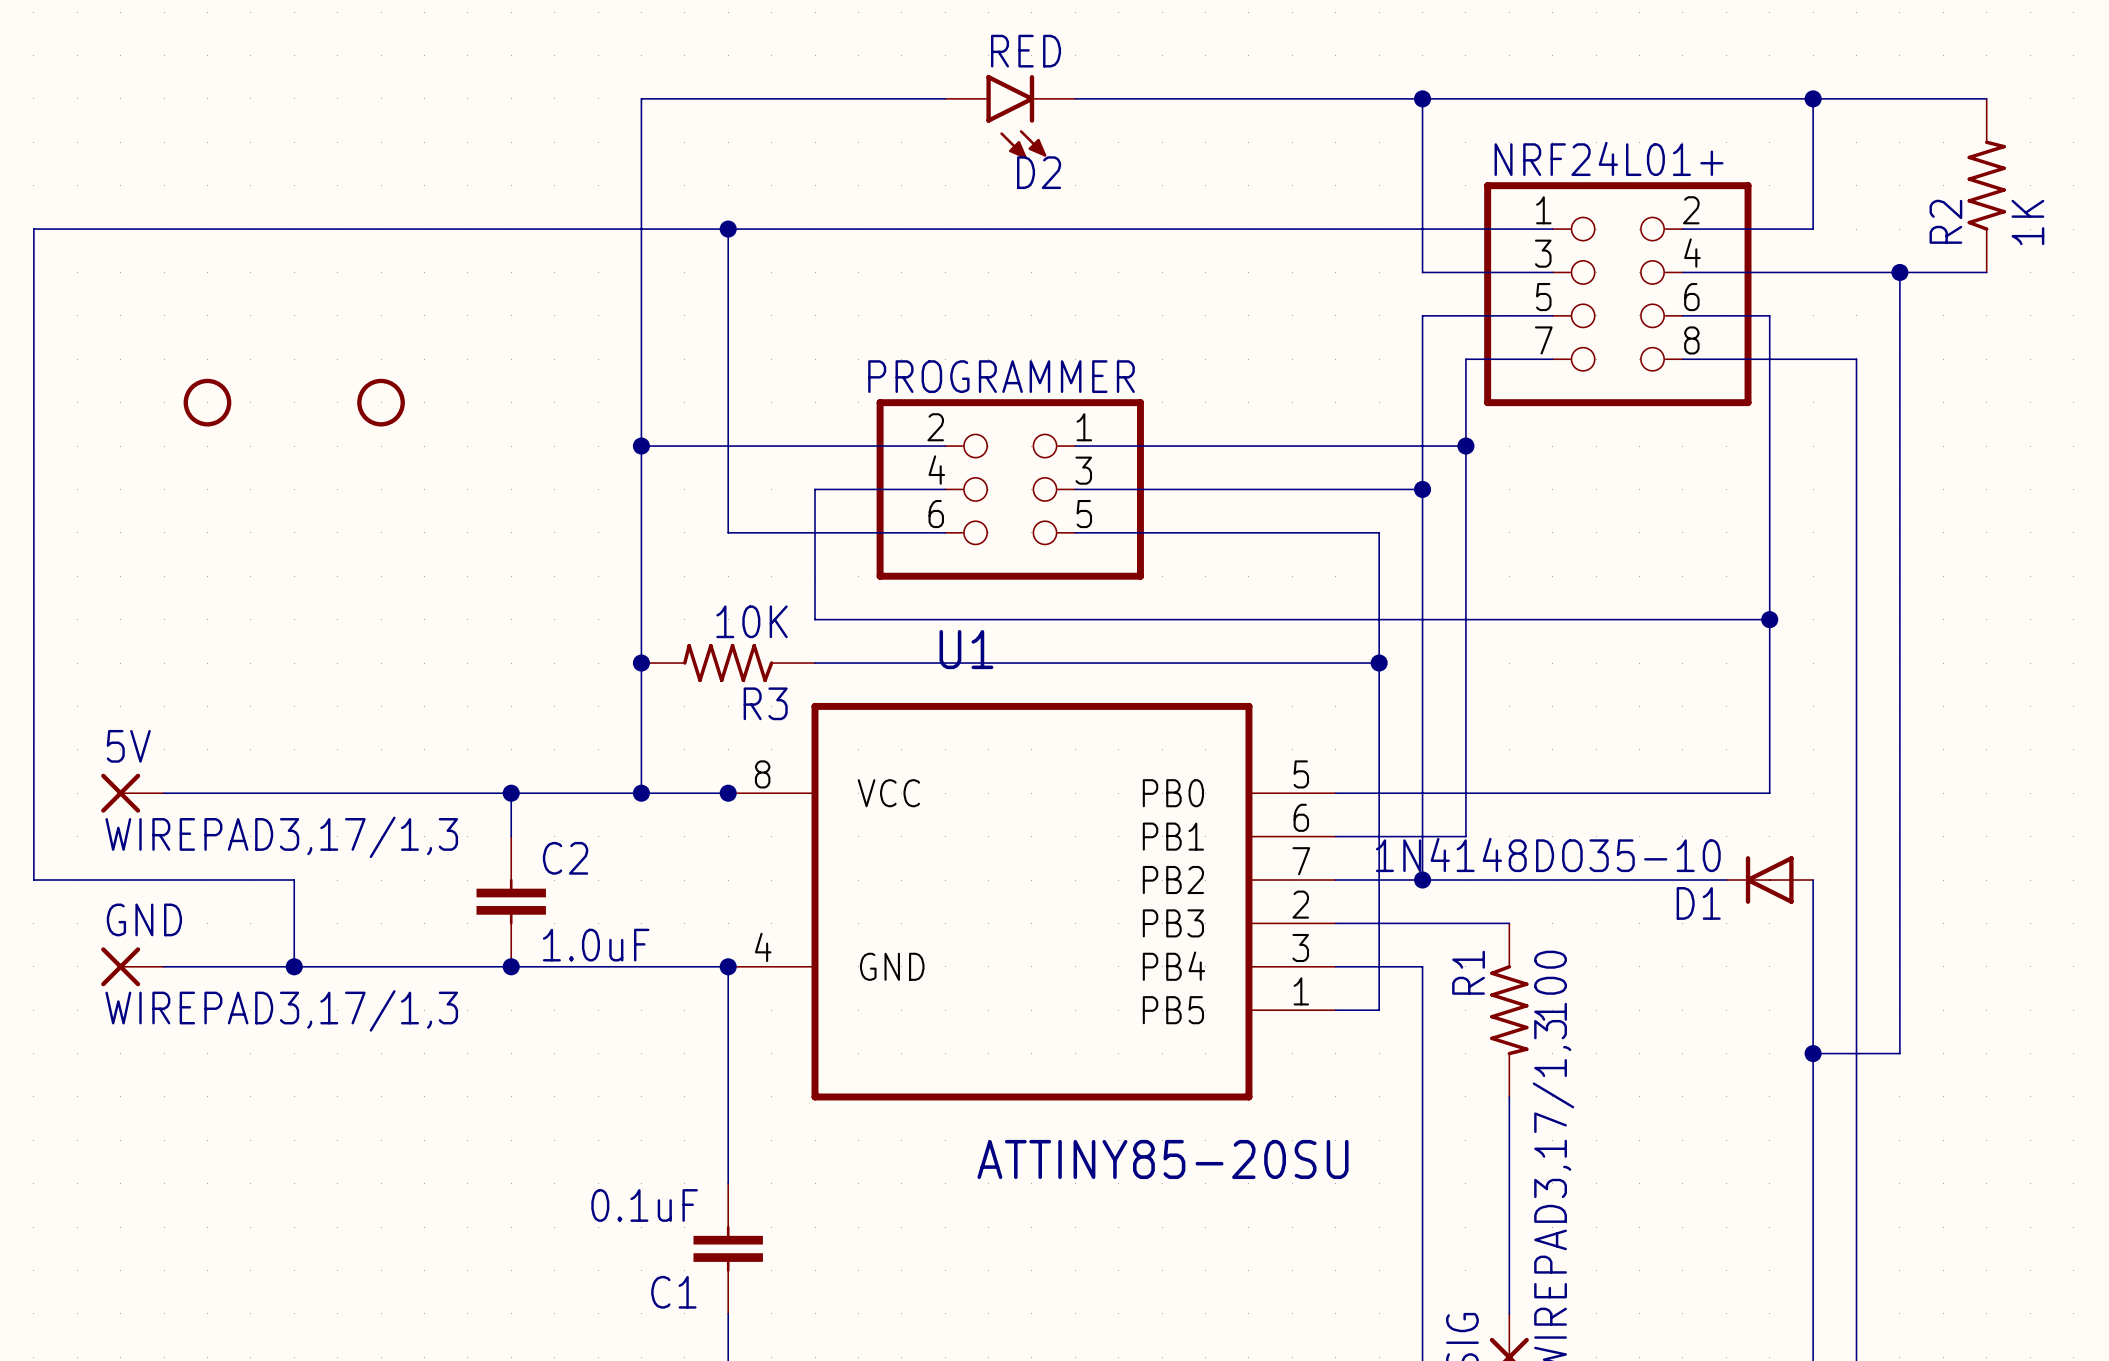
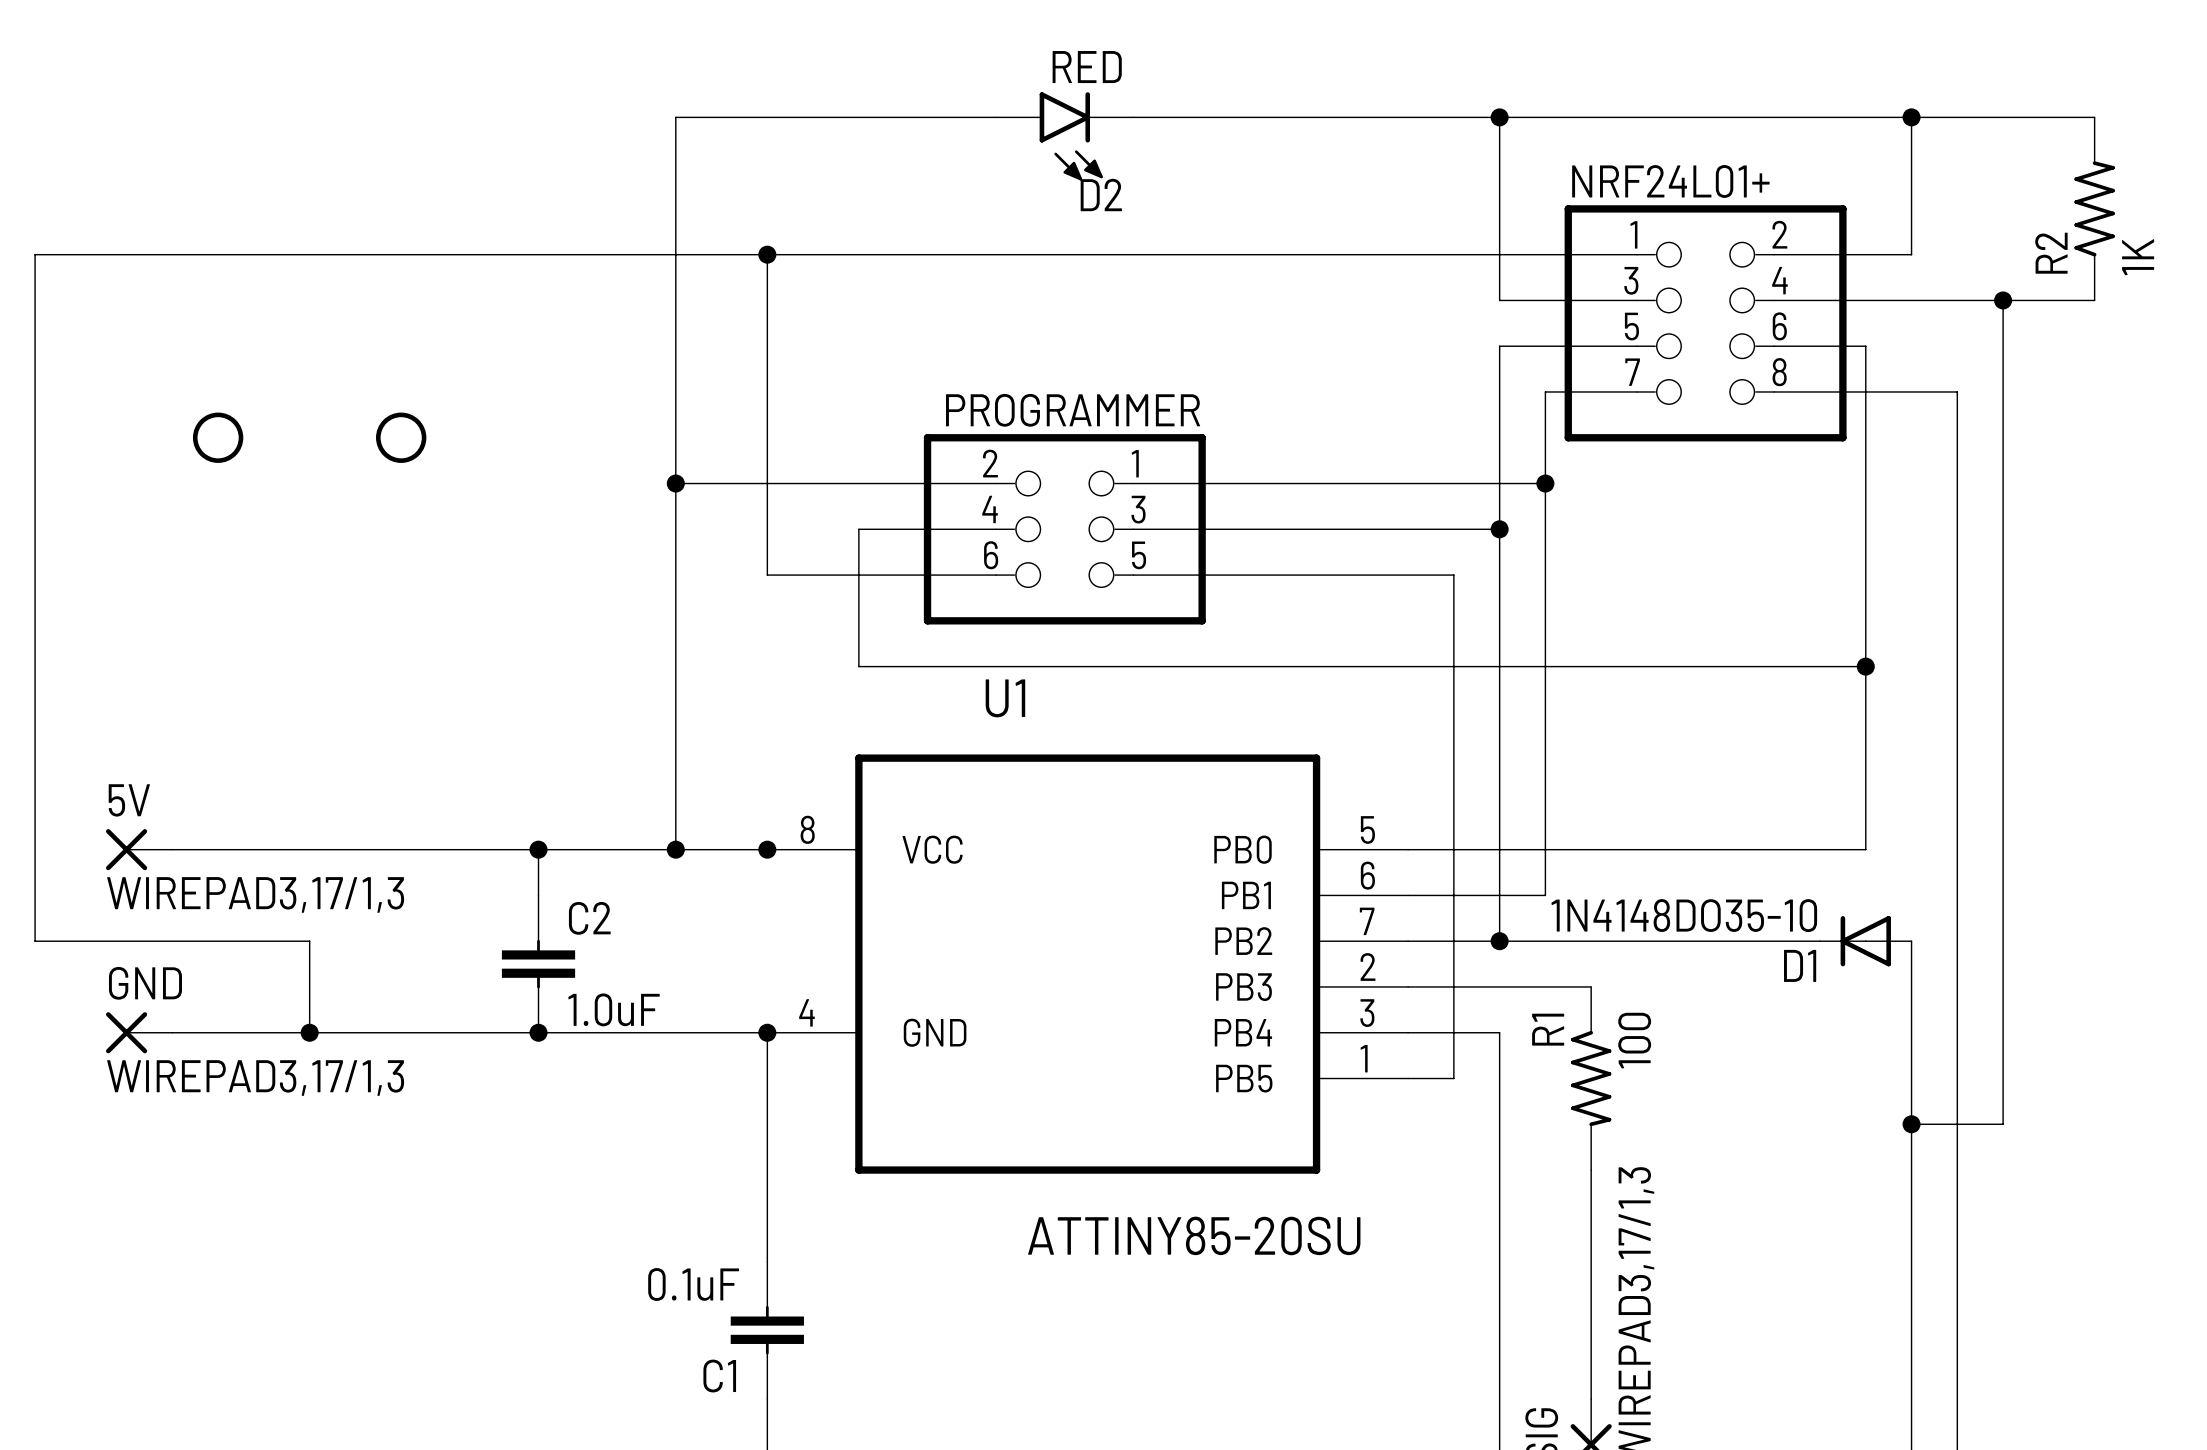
junction: (641, 663) -> none
R3: 10K (728, 663) -> none
wire: (815, 663) (1379, 663) -> none
junction: (1379, 663) -> none

